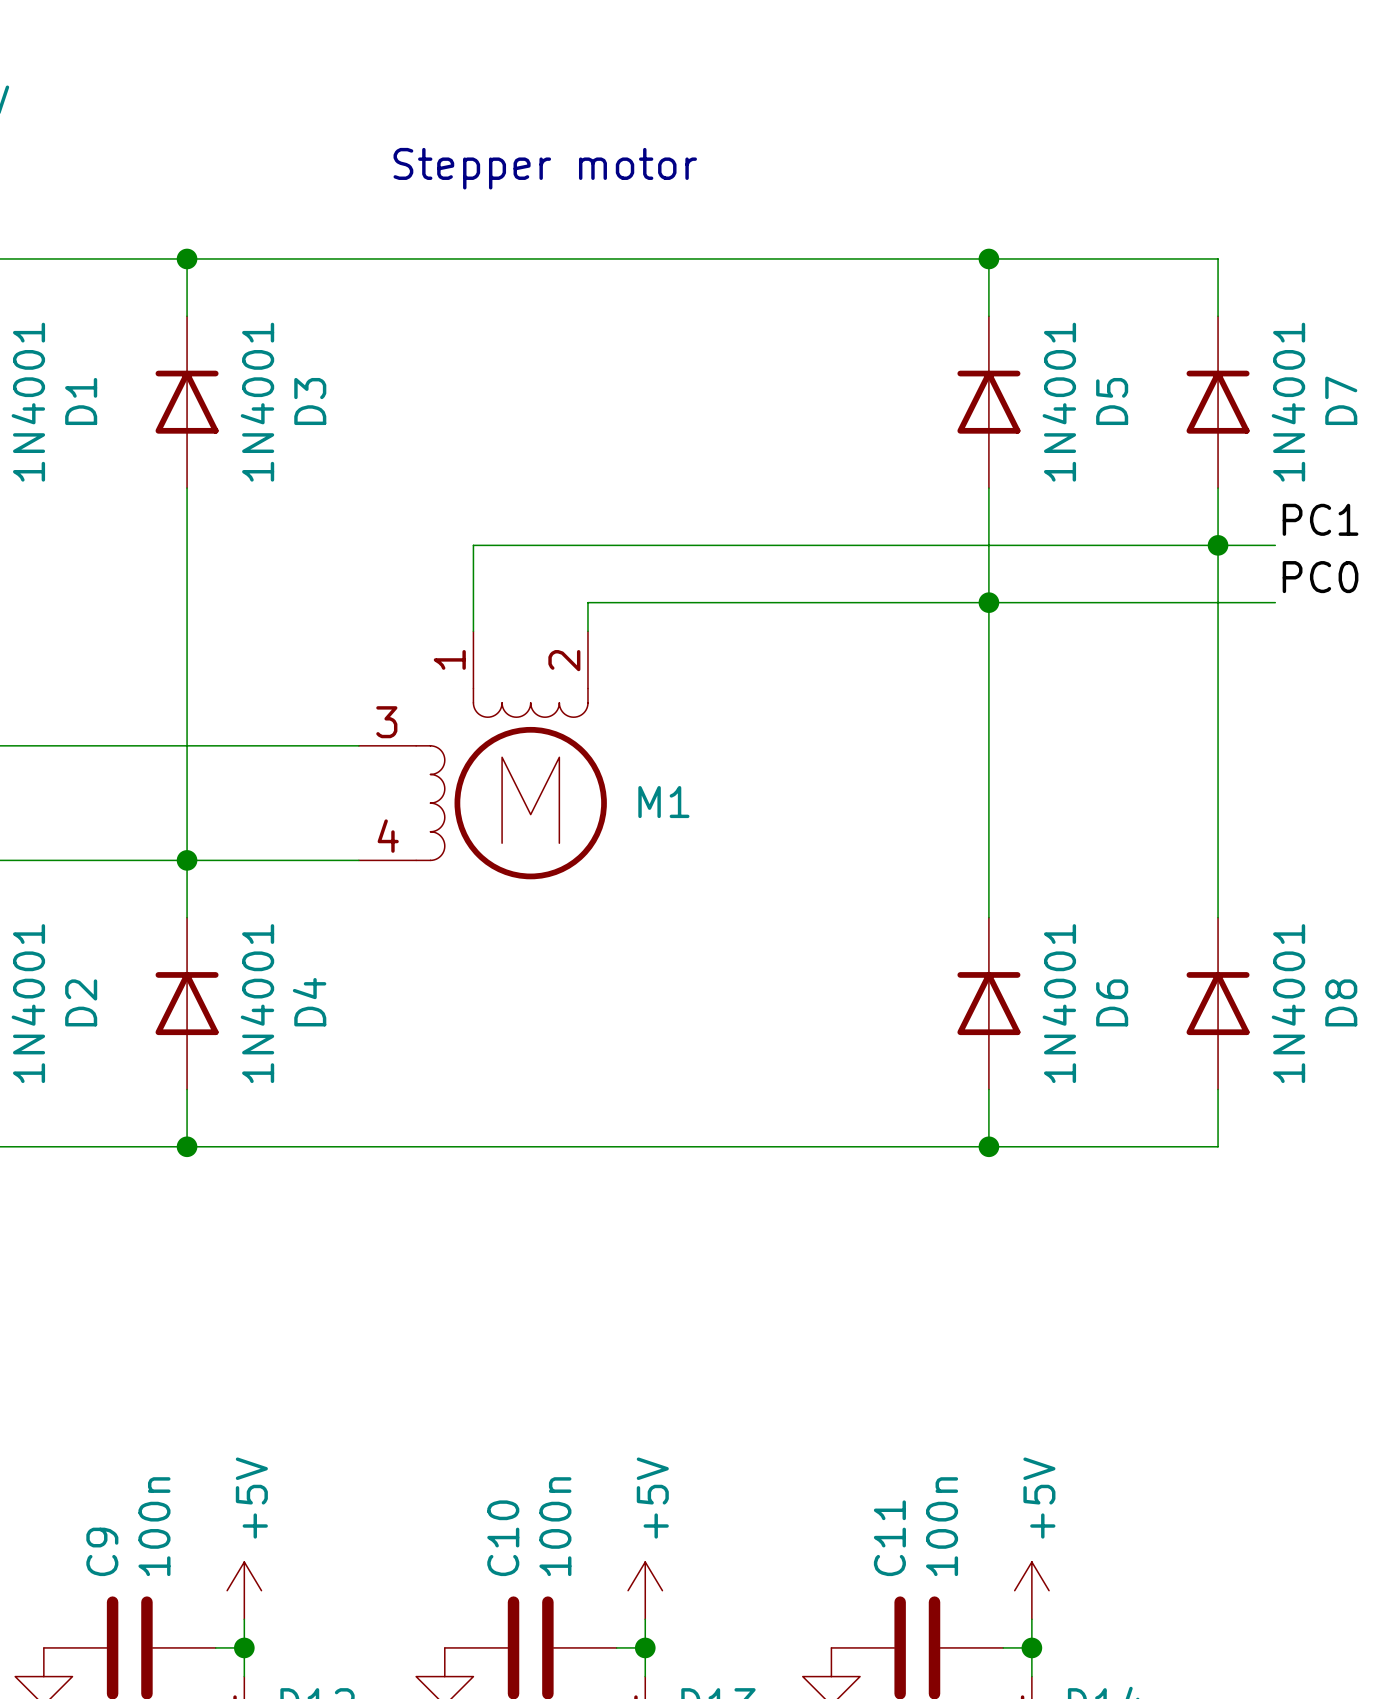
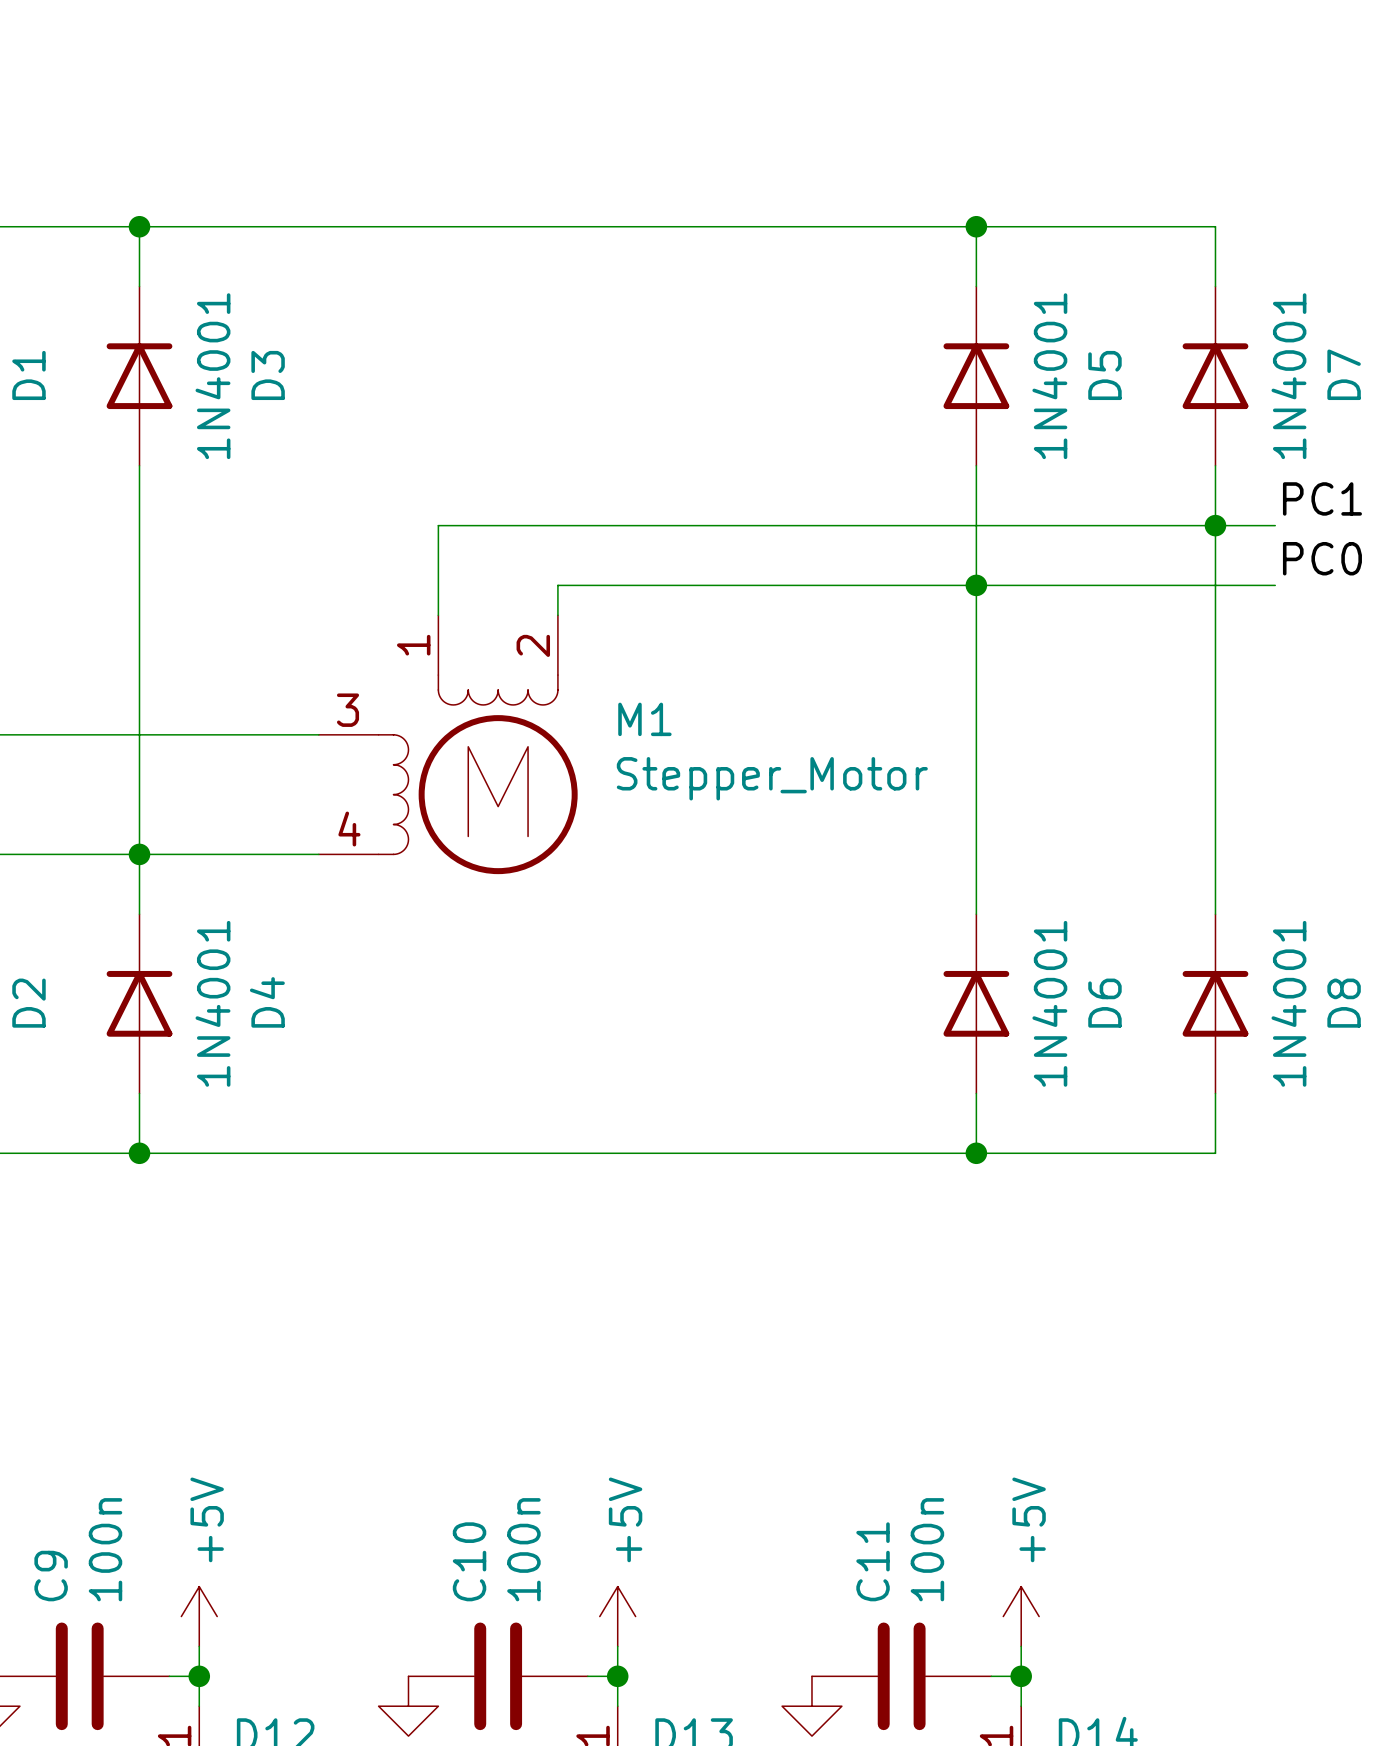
text: Stepper motor (545, 168) -> none
M1 value: none -> Stepper_Motor (772, 778)
M1 name position: M1 (663, 802) -> M1 (644, 719)

